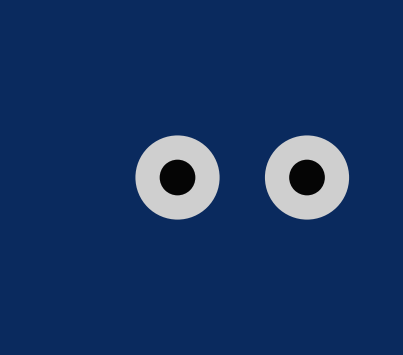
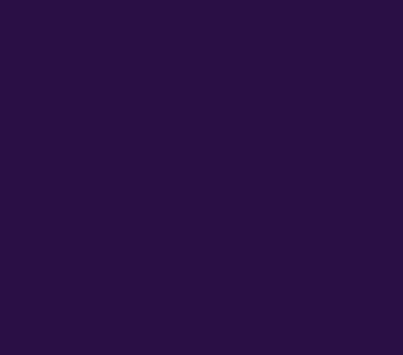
part: (242, 177) -> none

